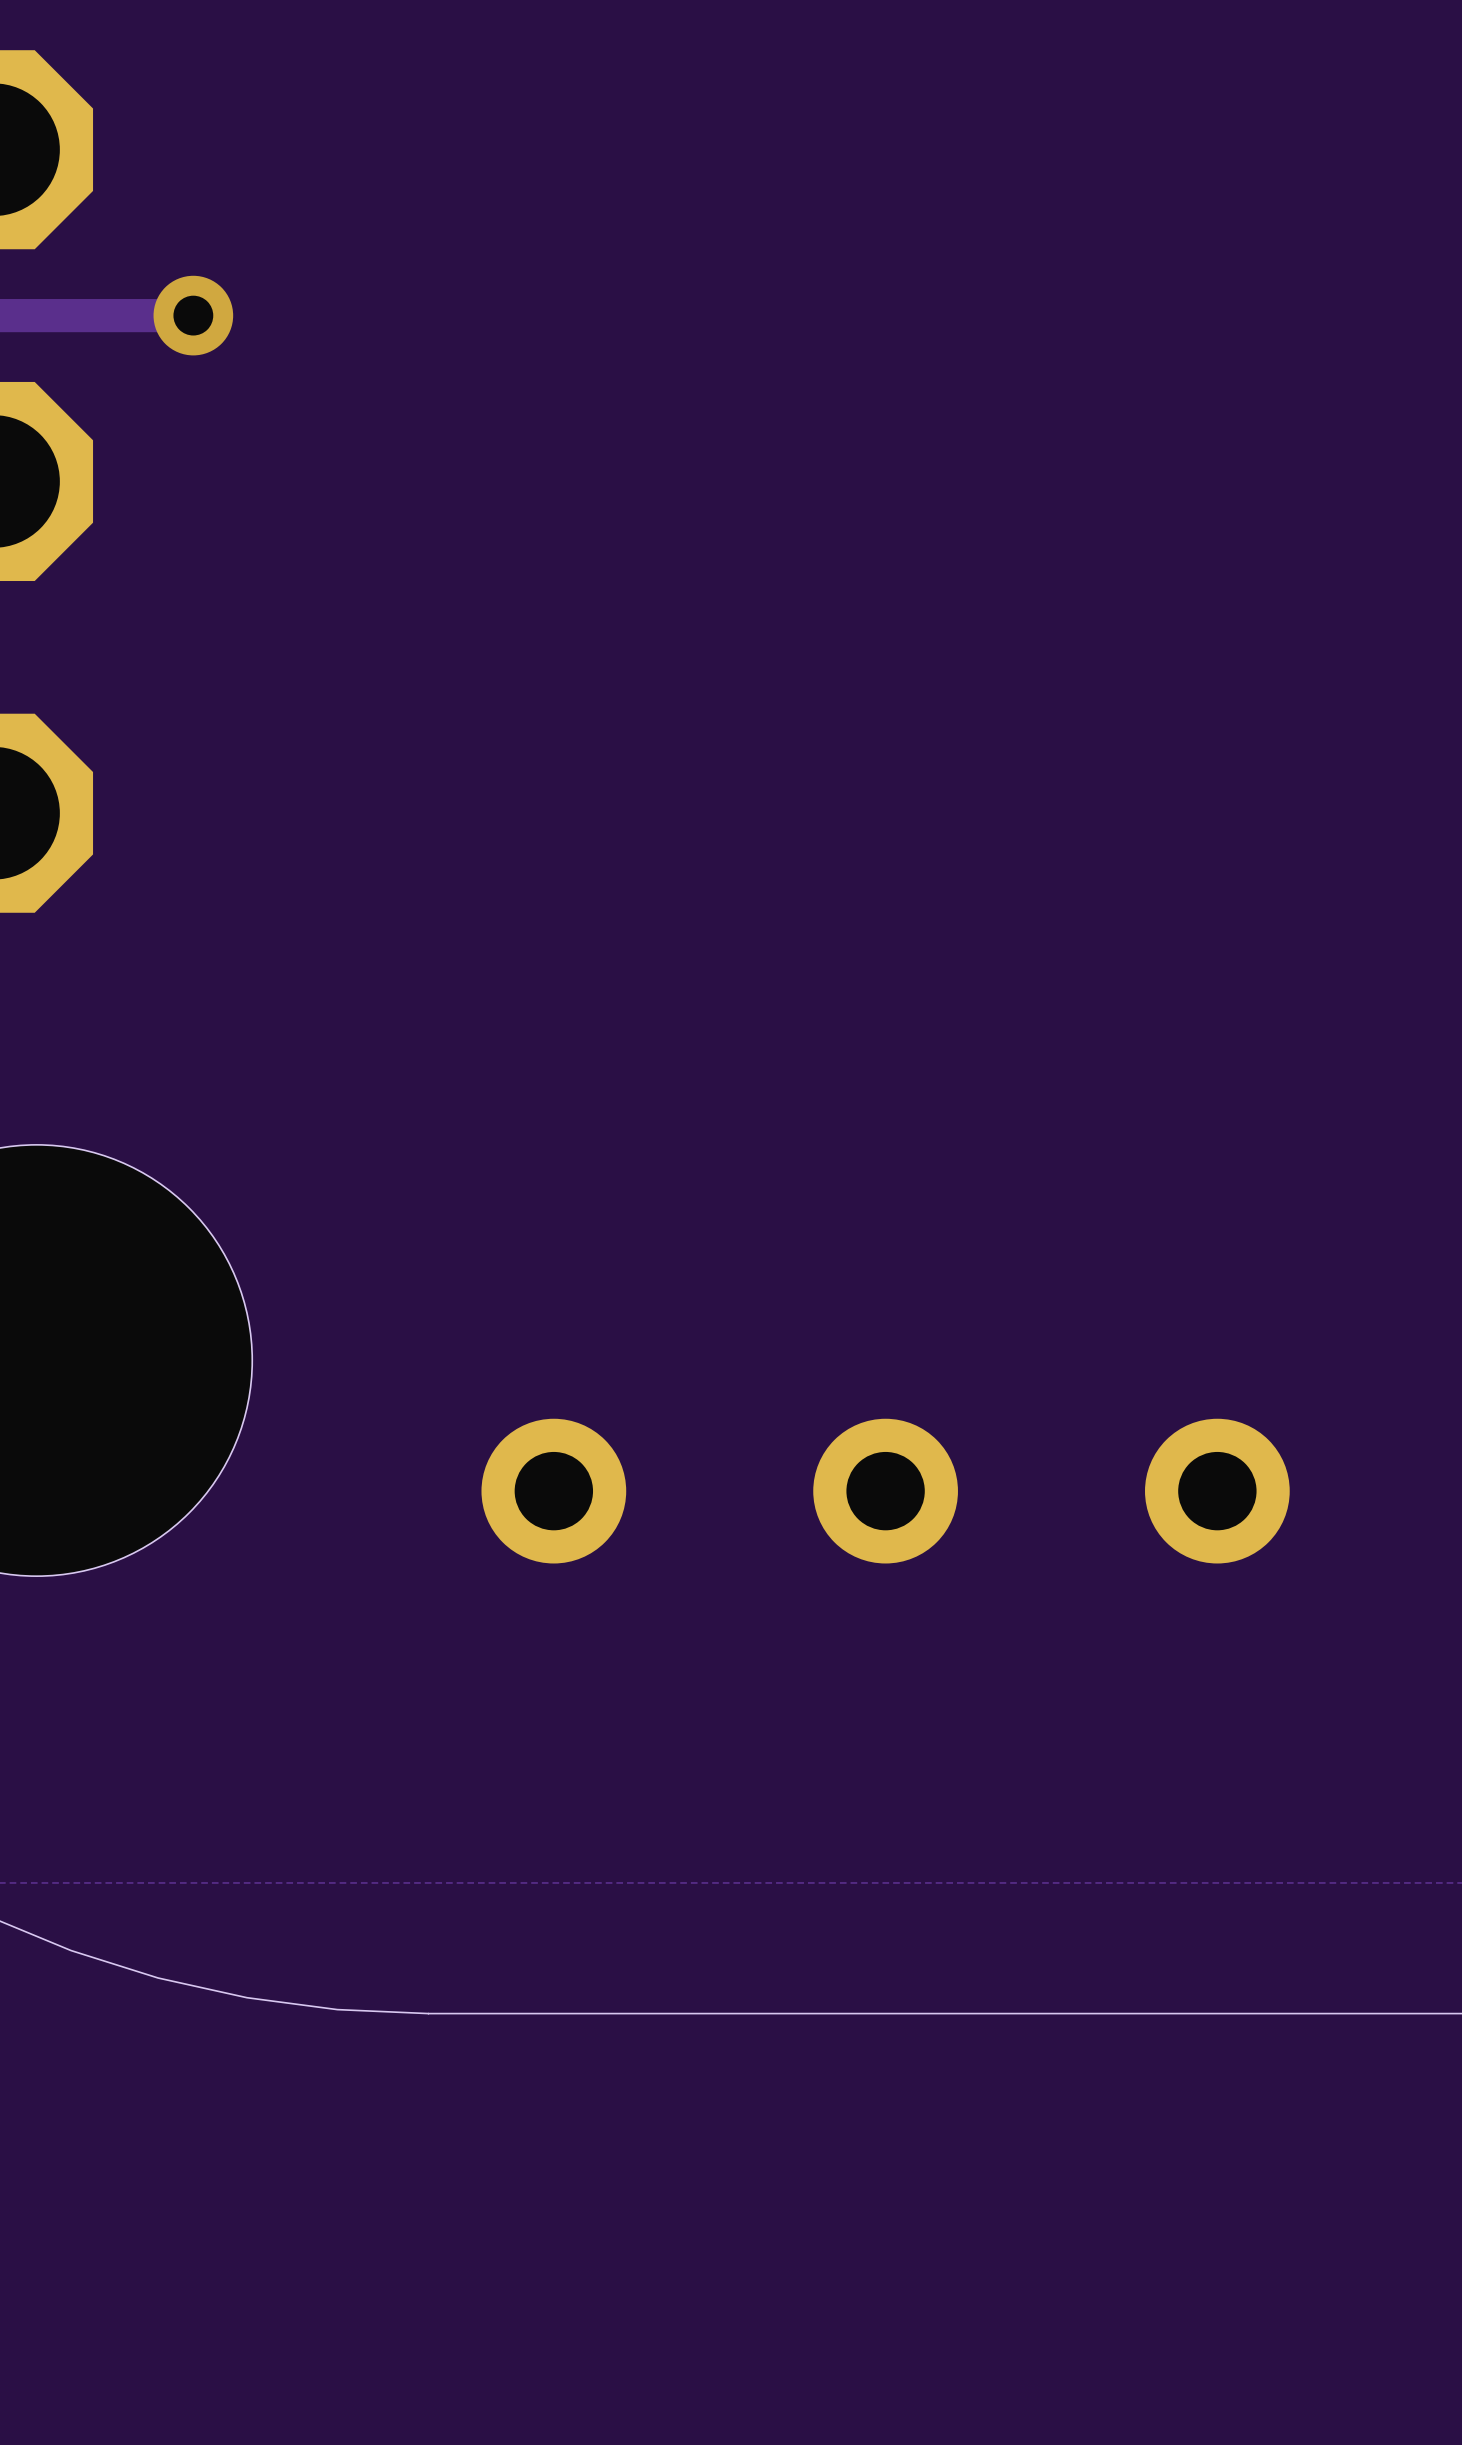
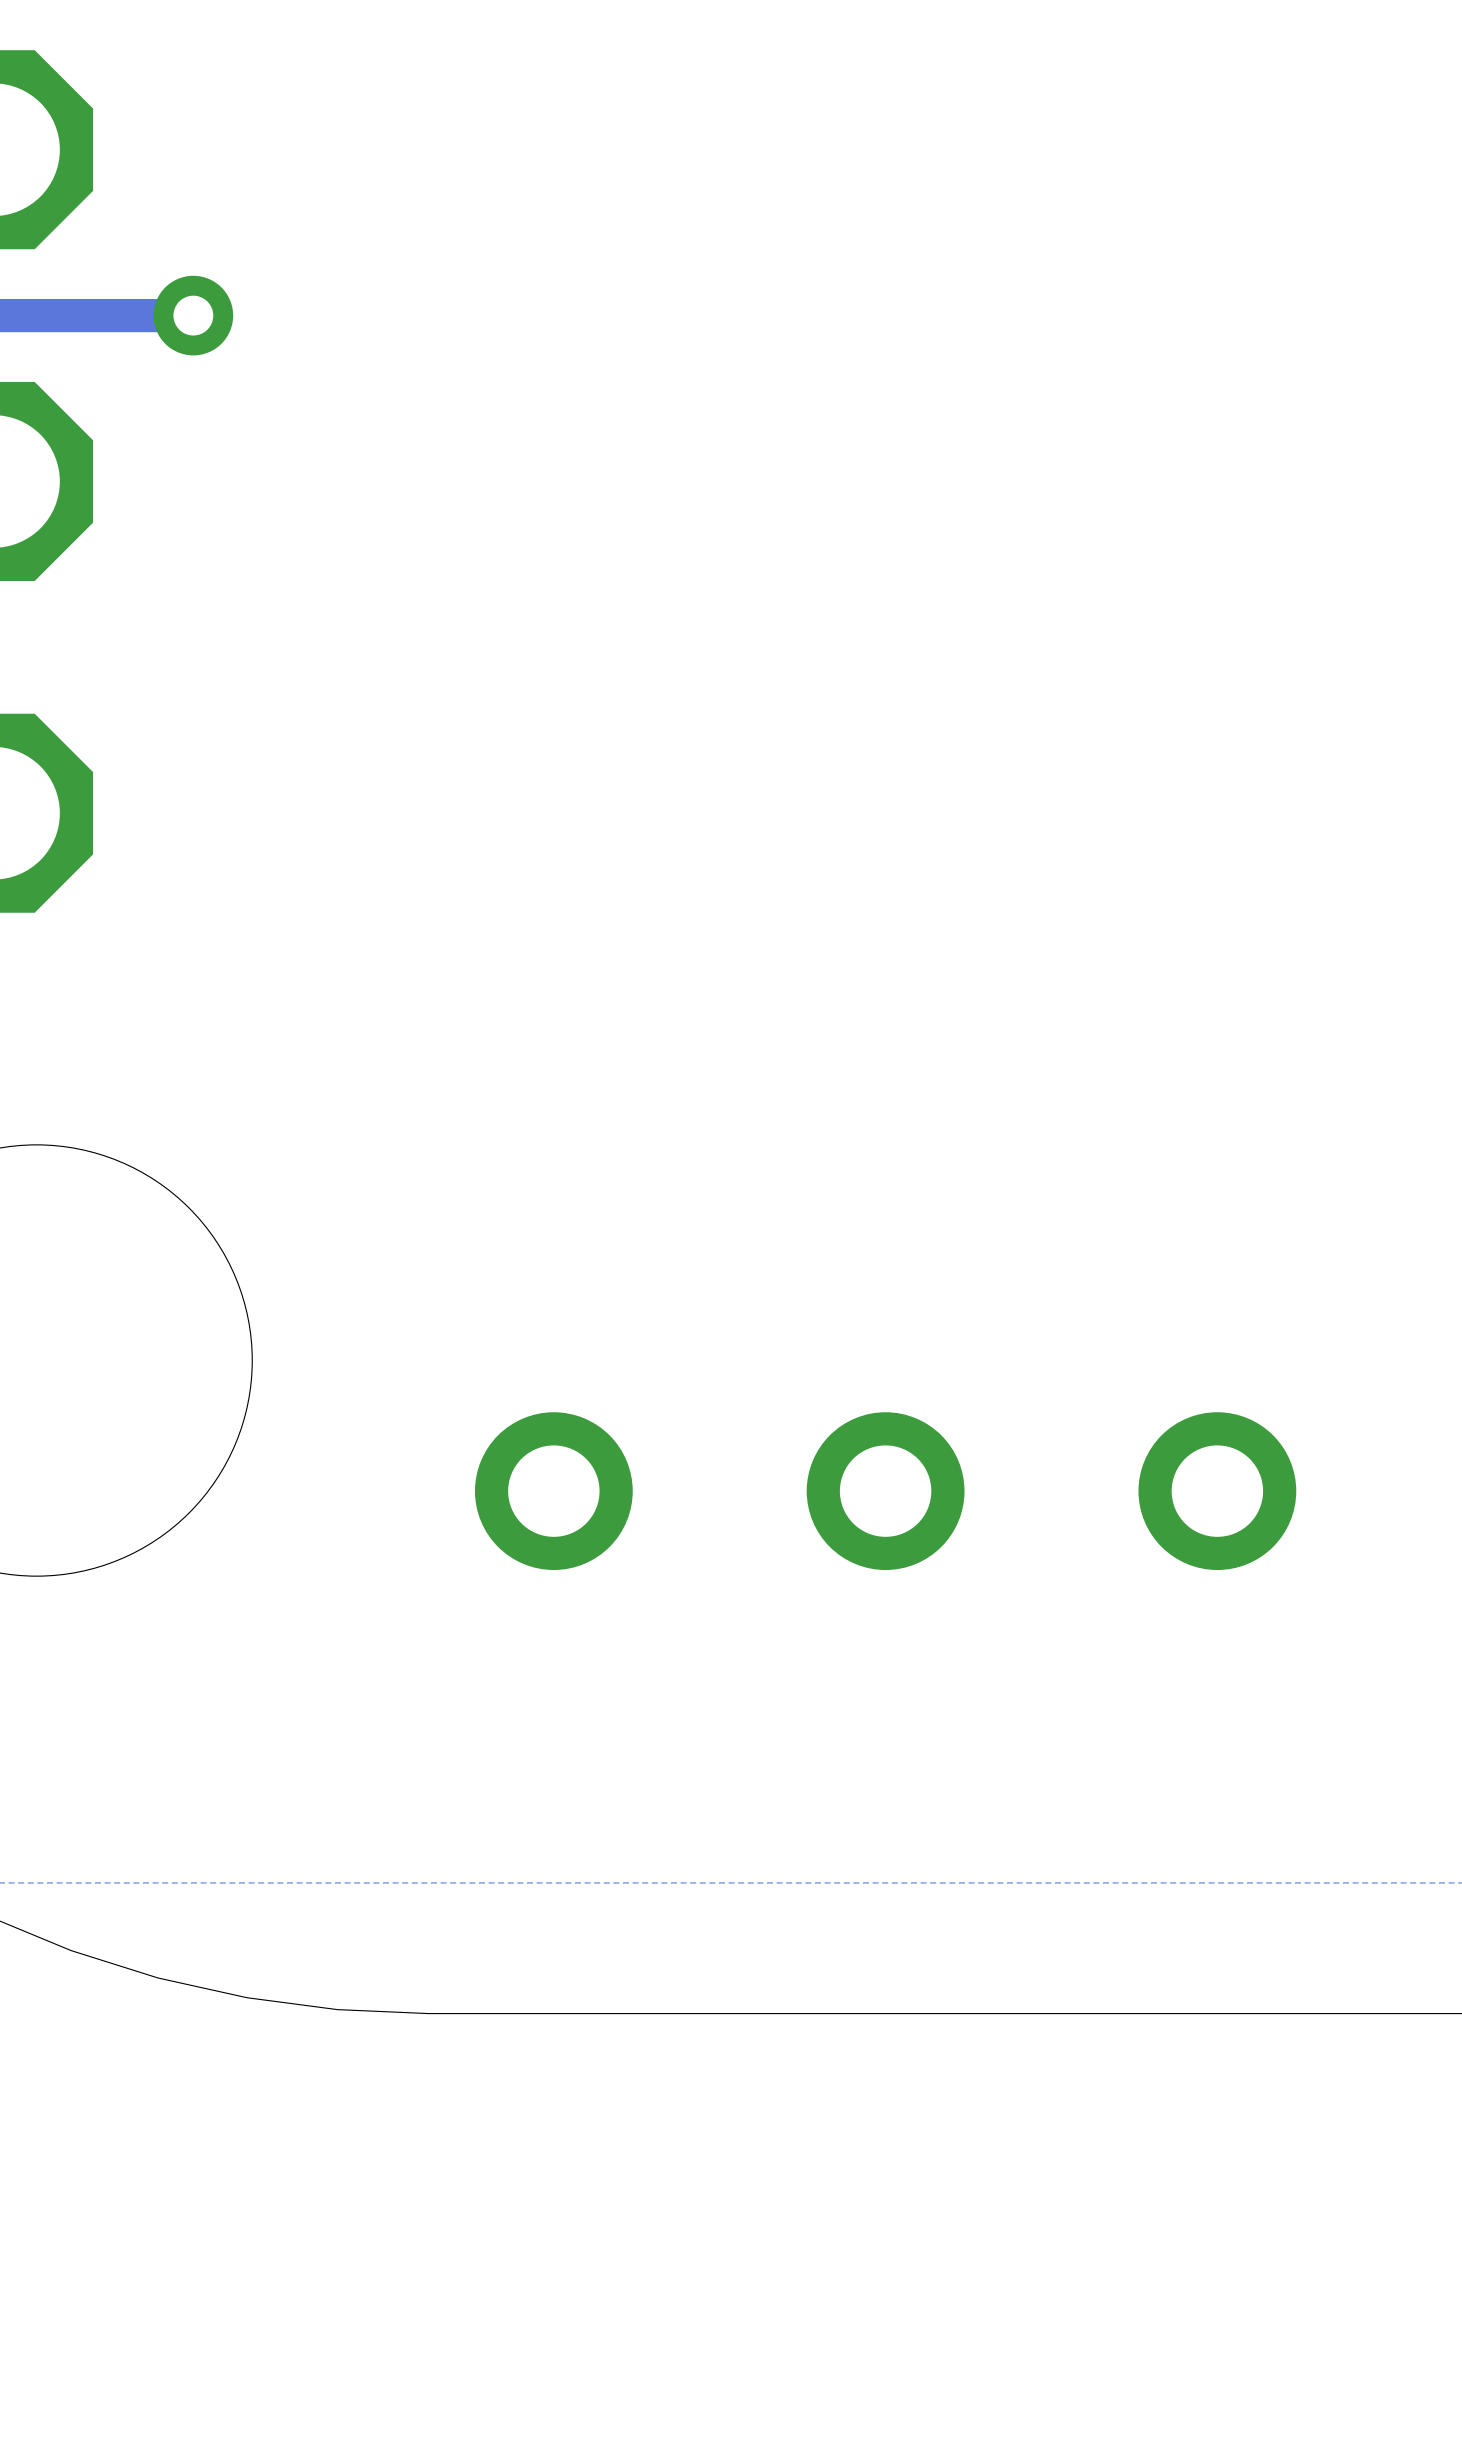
part footprint: [481, 1418, 1290, 1564] -> [474, 1412, 1297, 1571]

